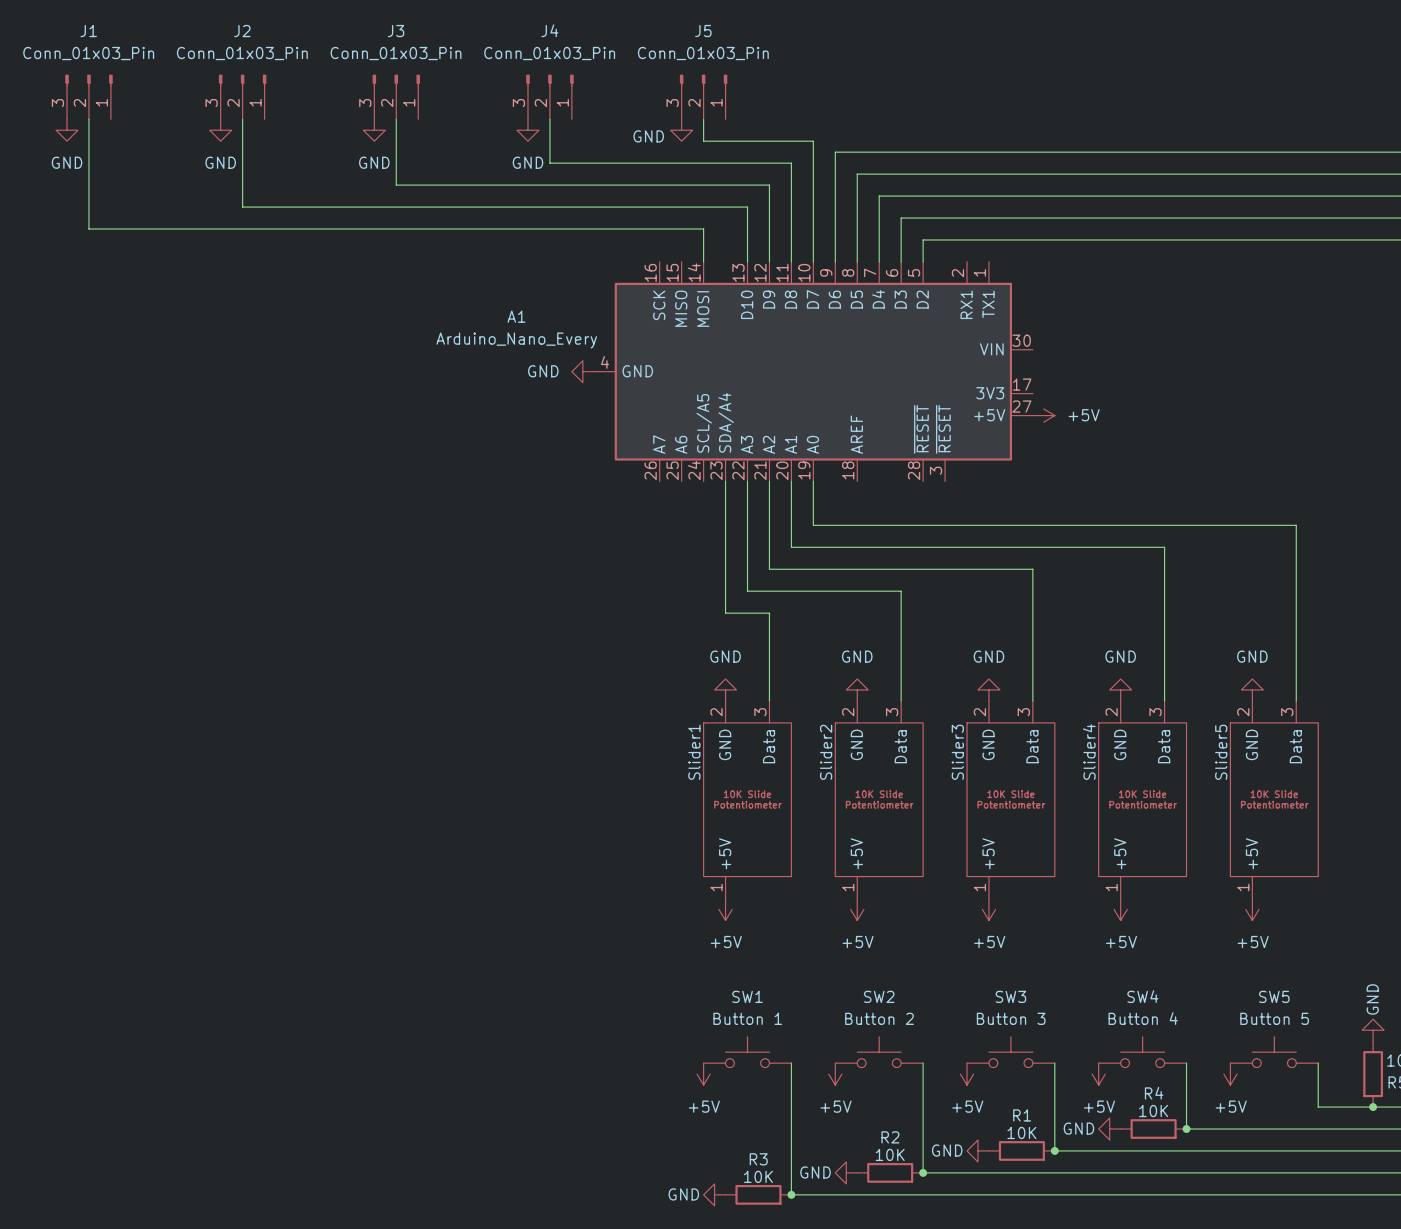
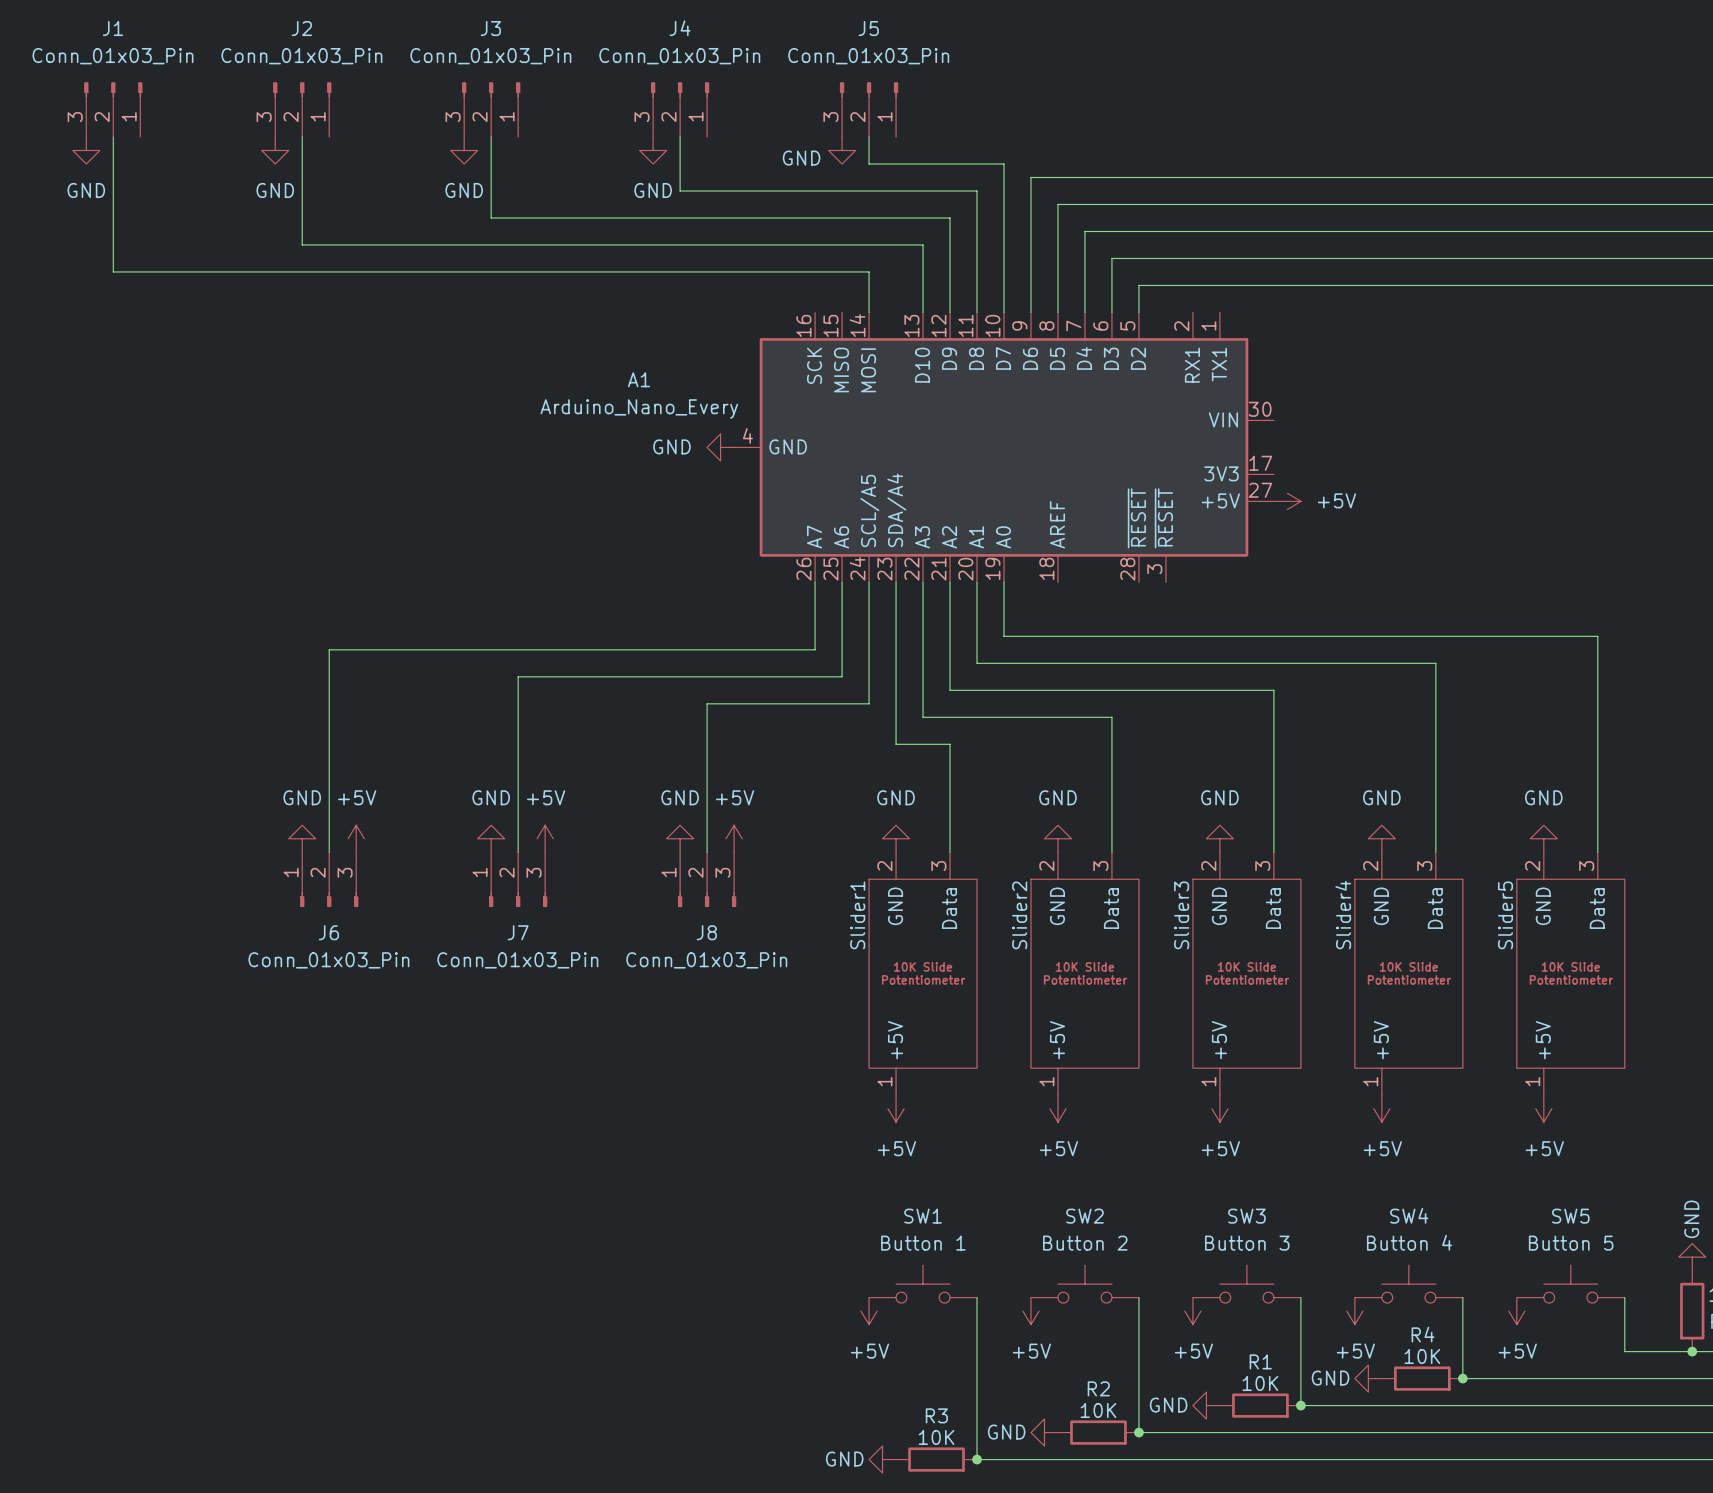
wire: none -> (815, 582) (815, 649) (329, 649) (329, 852)
wire: none -> (842, 582) (842, 676) (518, 676) (518, 852)
wire: none -> (869, 582) (869, 703) (707, 703) (707, 852)
power symbol: none -> GND (302, 838)
power symbol: none -> +5V (356, 838)
power symbol: none -> GND (491, 838)
power symbol: none -> +5V (545, 838)
power symbol: none -> GND (680, 838)
power symbol: none -> +5V (734, 838)
J6: none -> Conn_01x03_Pin (329, 879)
J7: none -> Conn_01x03_Pin (518, 879)
J8: none -> Conn_01x03_Pin (707, 879)

